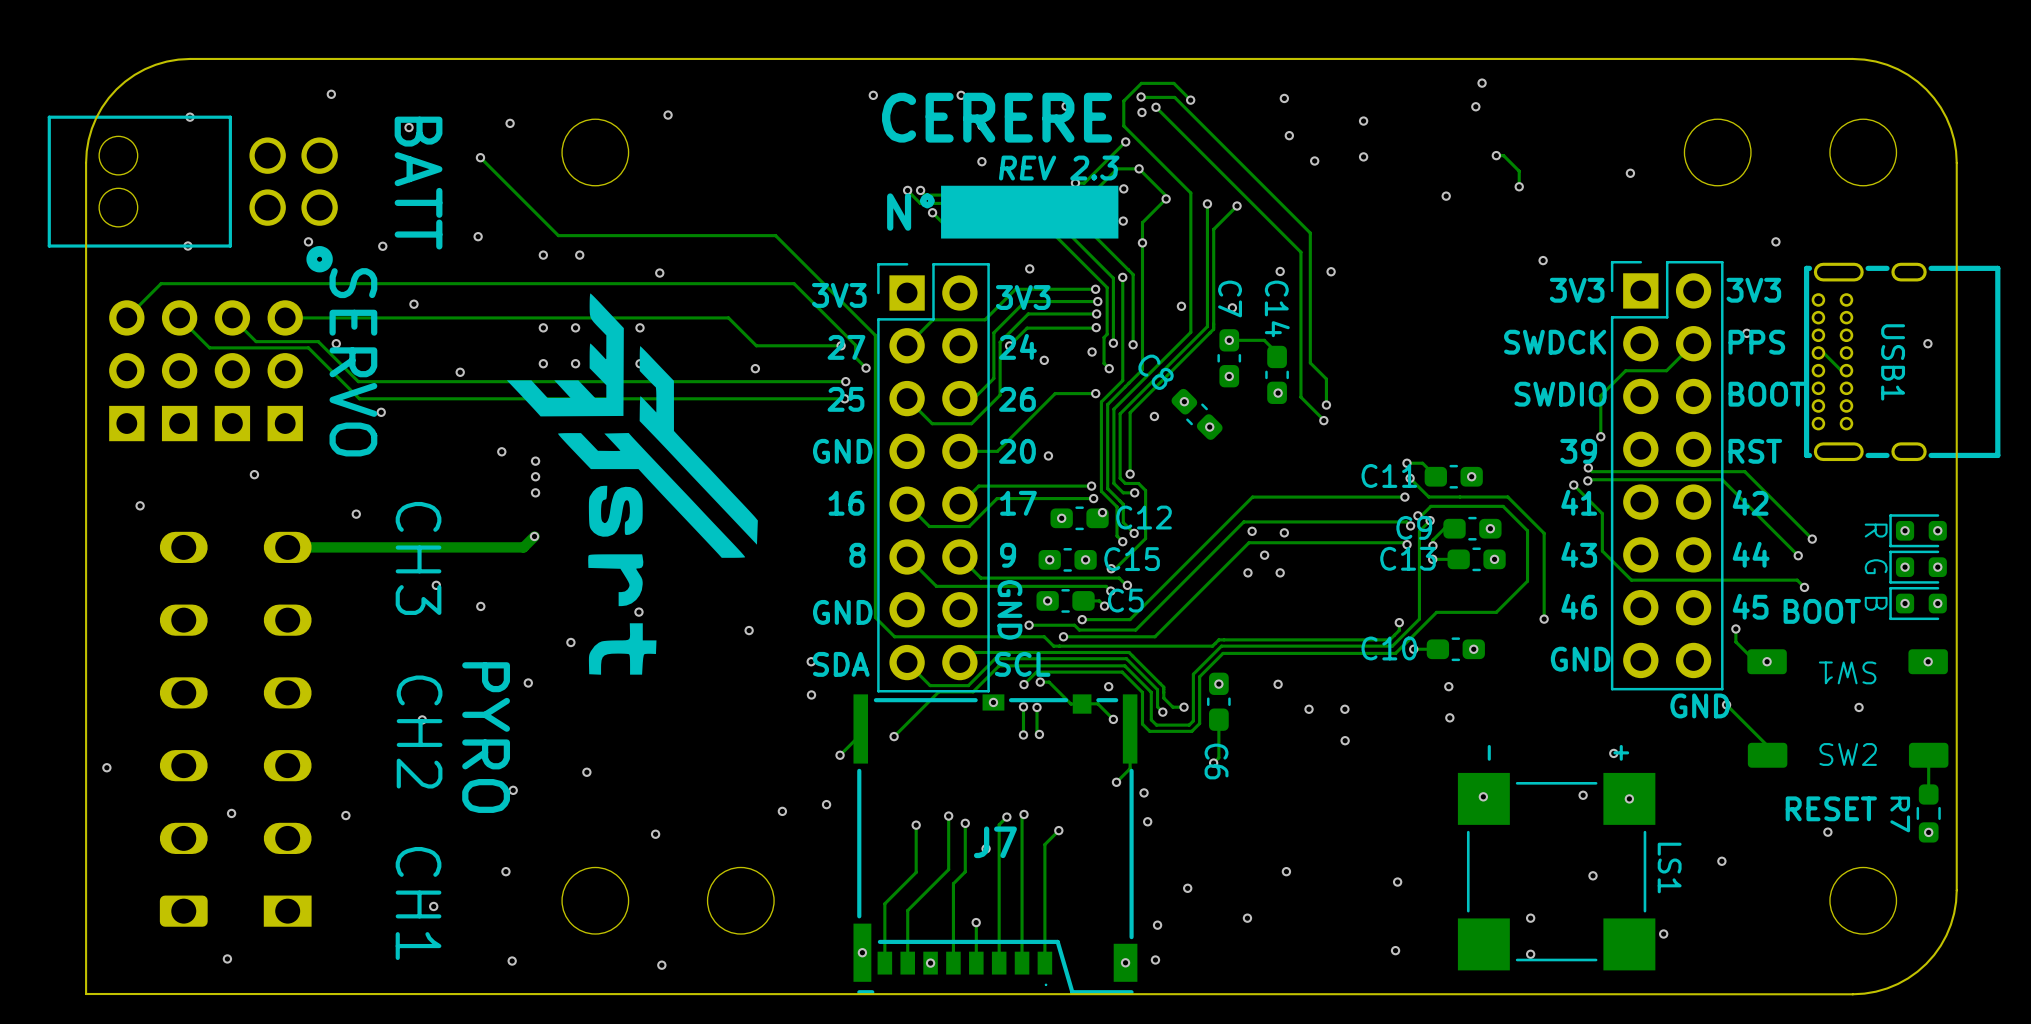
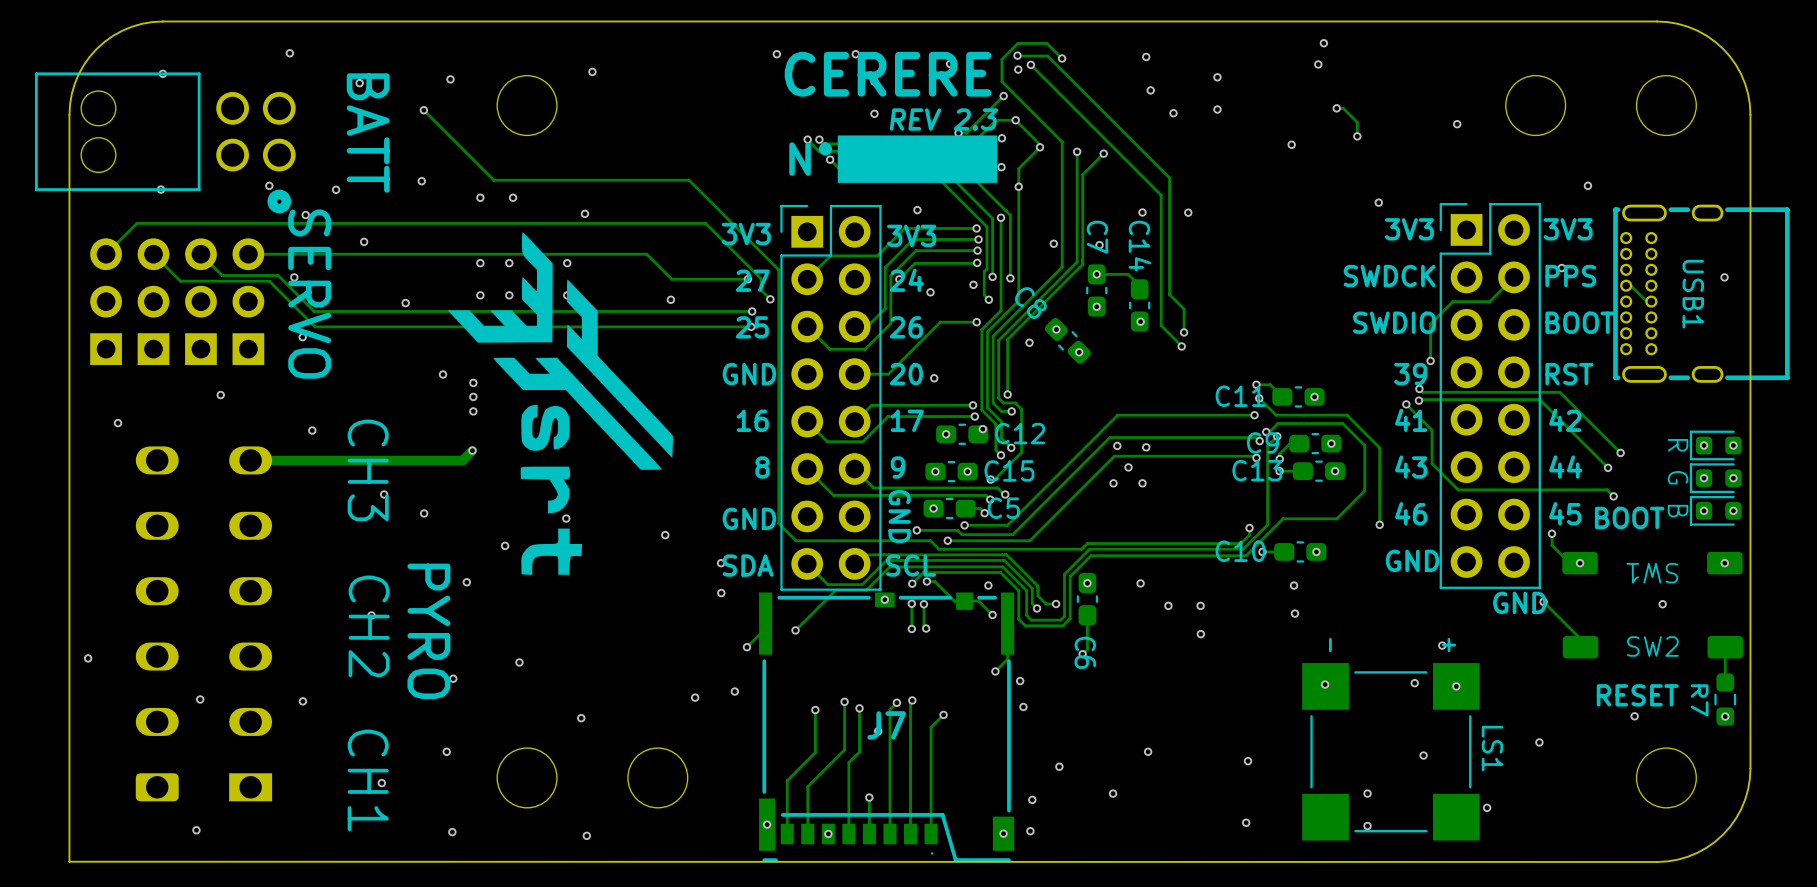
via: none -> (305, 215)
via position: (381, 412) -> (302, 337)

